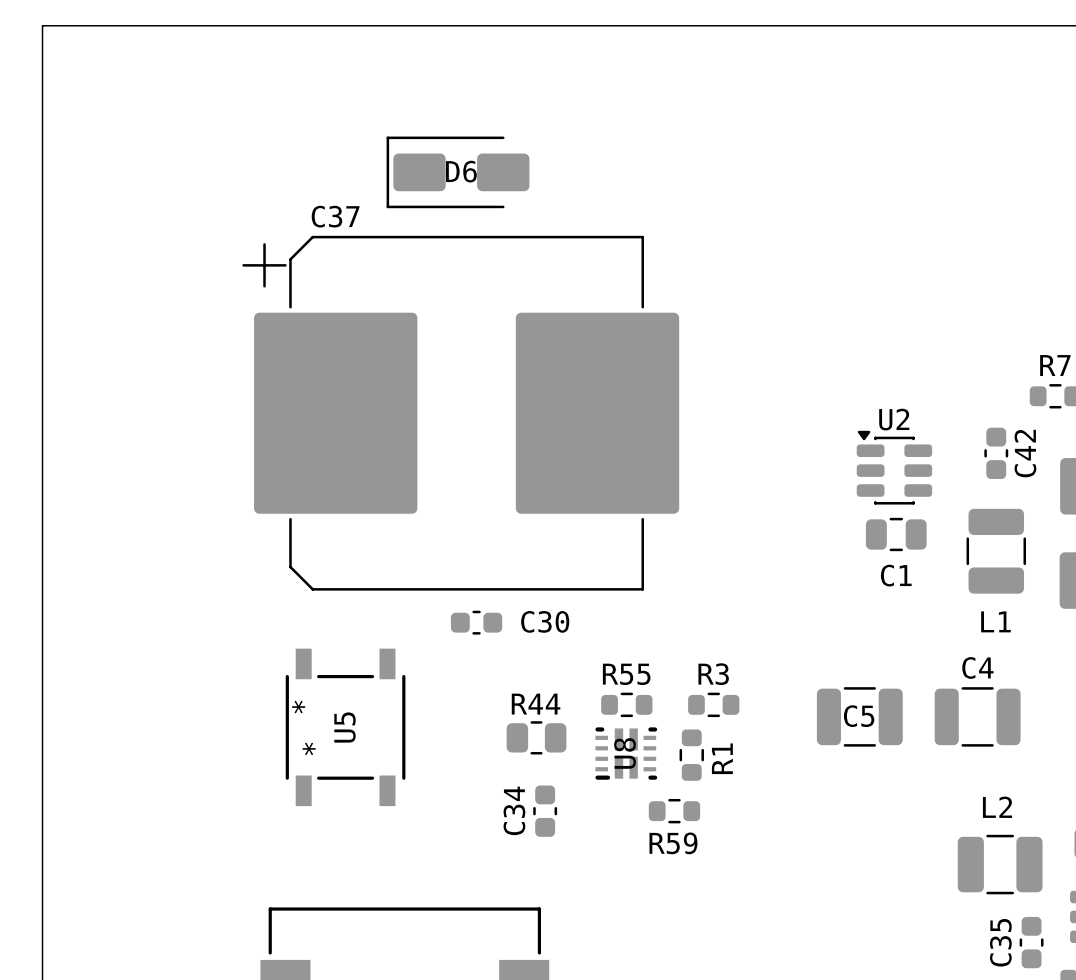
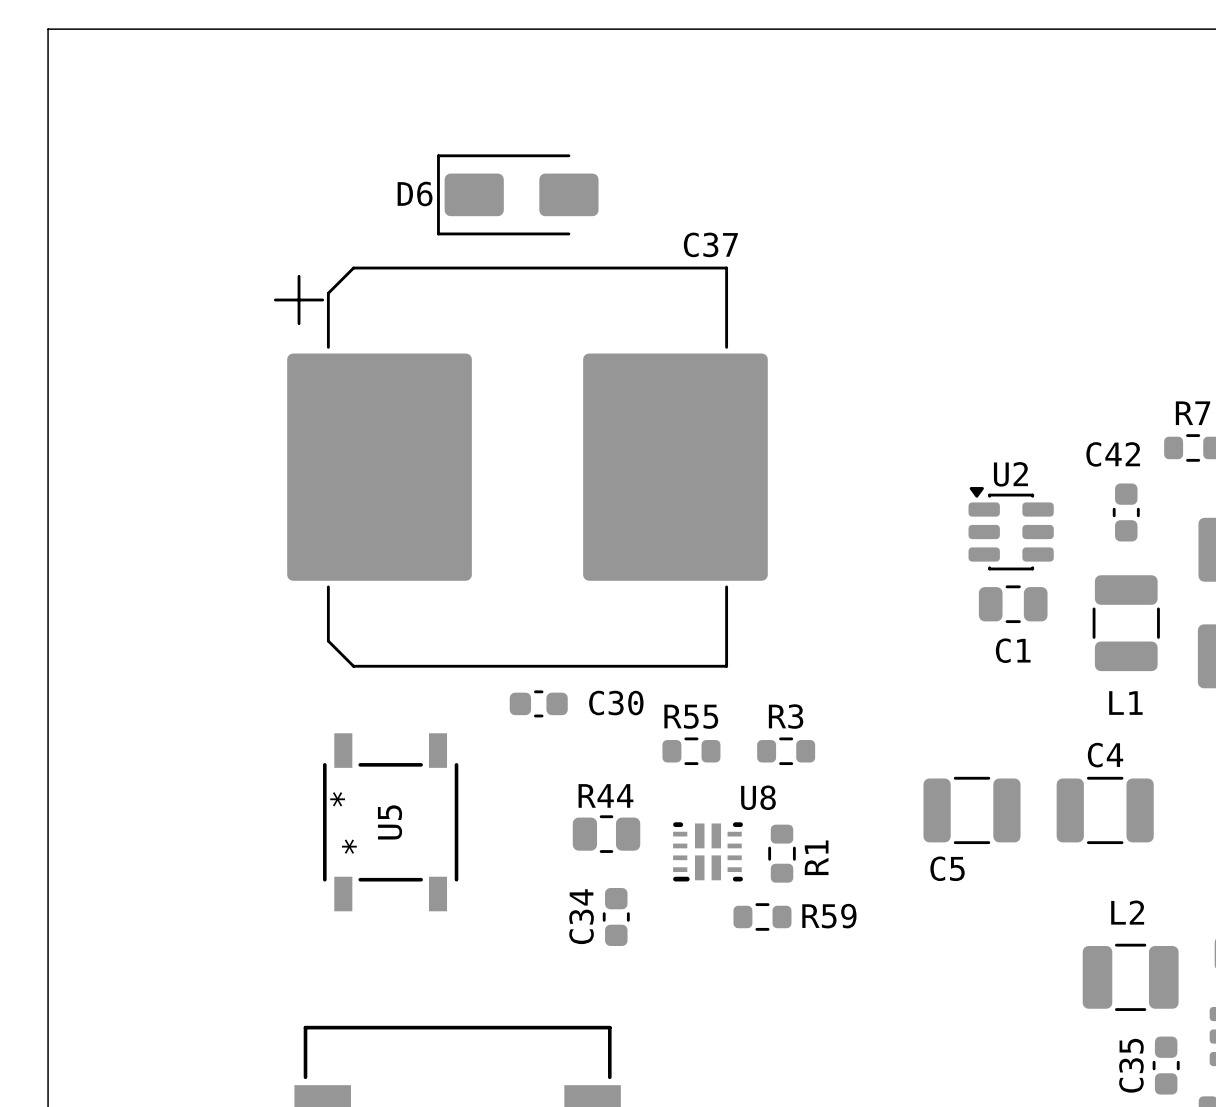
D6 name position: D6 (461, 171) -> D6 (415, 194)
C37 name position: C37 (335, 216) -> C37 (710, 244)
C42 name rotation: 0° (1025, 453) -> 90° clockwise (1113, 454)
R55 position: (626, 704) -> (691, 751)
R3 position: (713, 704) -> (786, 751)
C5 name position: C5 (859, 716) -> C5 (947, 868)
U8 name rotation: 0° (625, 753) -> 90° clockwise (758, 797)
U8 name position: U8 (625, 753) -> U8 (758, 797)
R59 name position: R59 (673, 843) -> R59 (829, 916)

